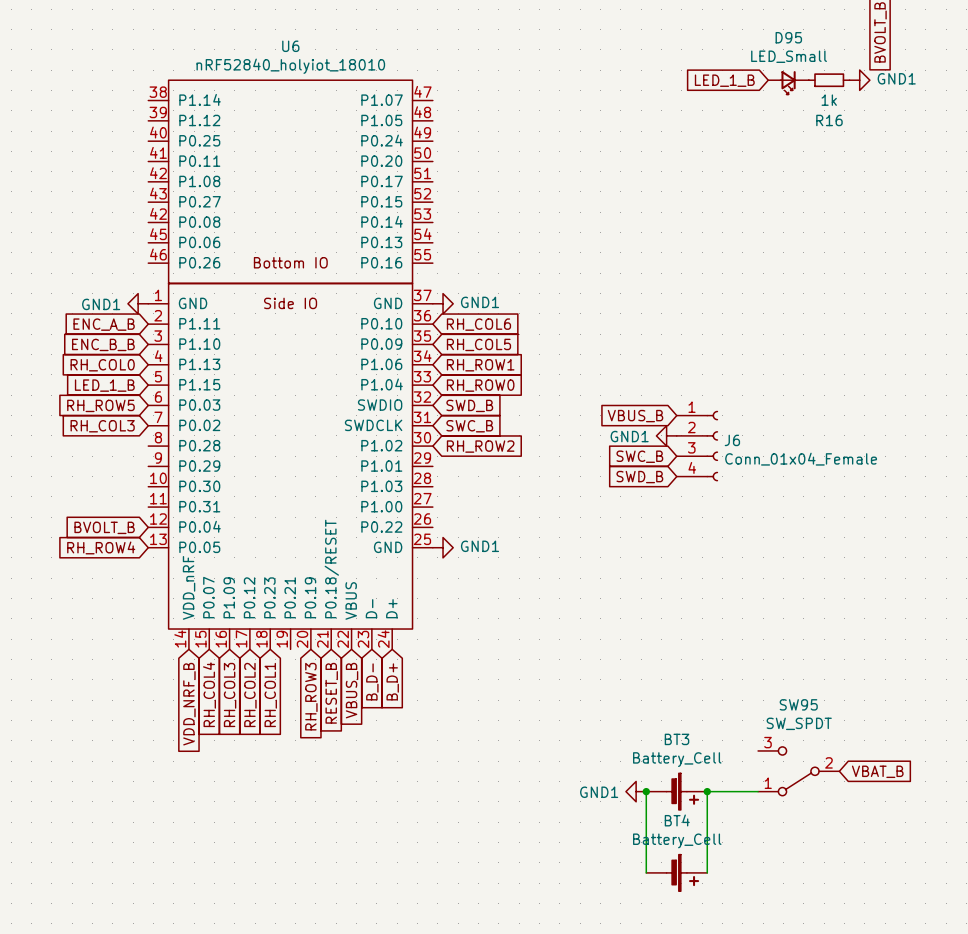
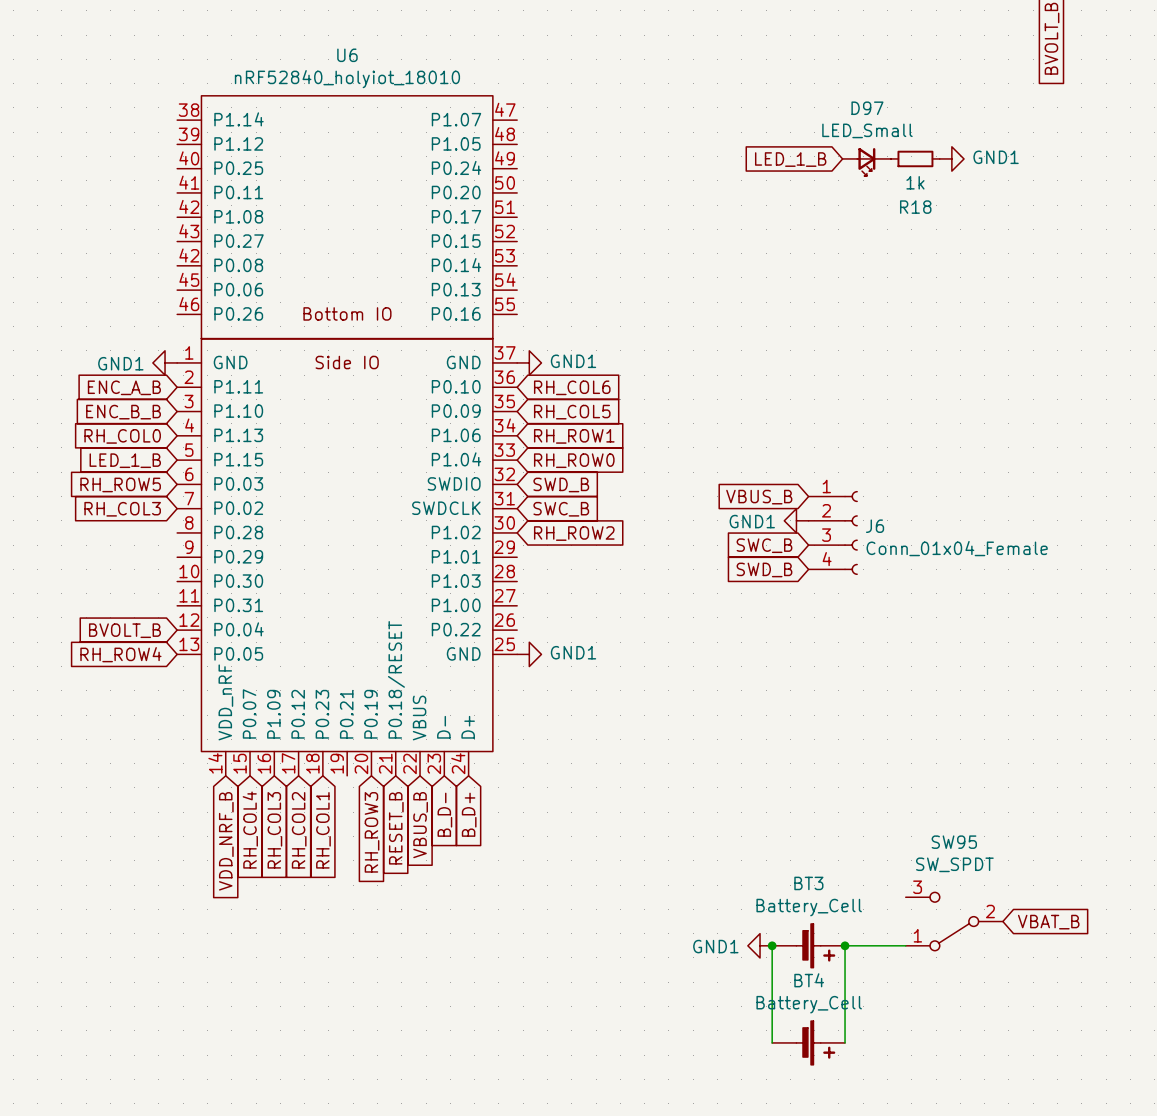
global label position: LED_1_B (724, 80) -> LED_1_B (790, 159)
R16: 1k (829, 80) -> none
power symbol position: GND1 (859, 80) -> GND1 (951, 158)
D95: LED_Small (788, 82) -> none
R18: none -> 1k (915, 158)
D97: none -> LED_Small (866, 162)

